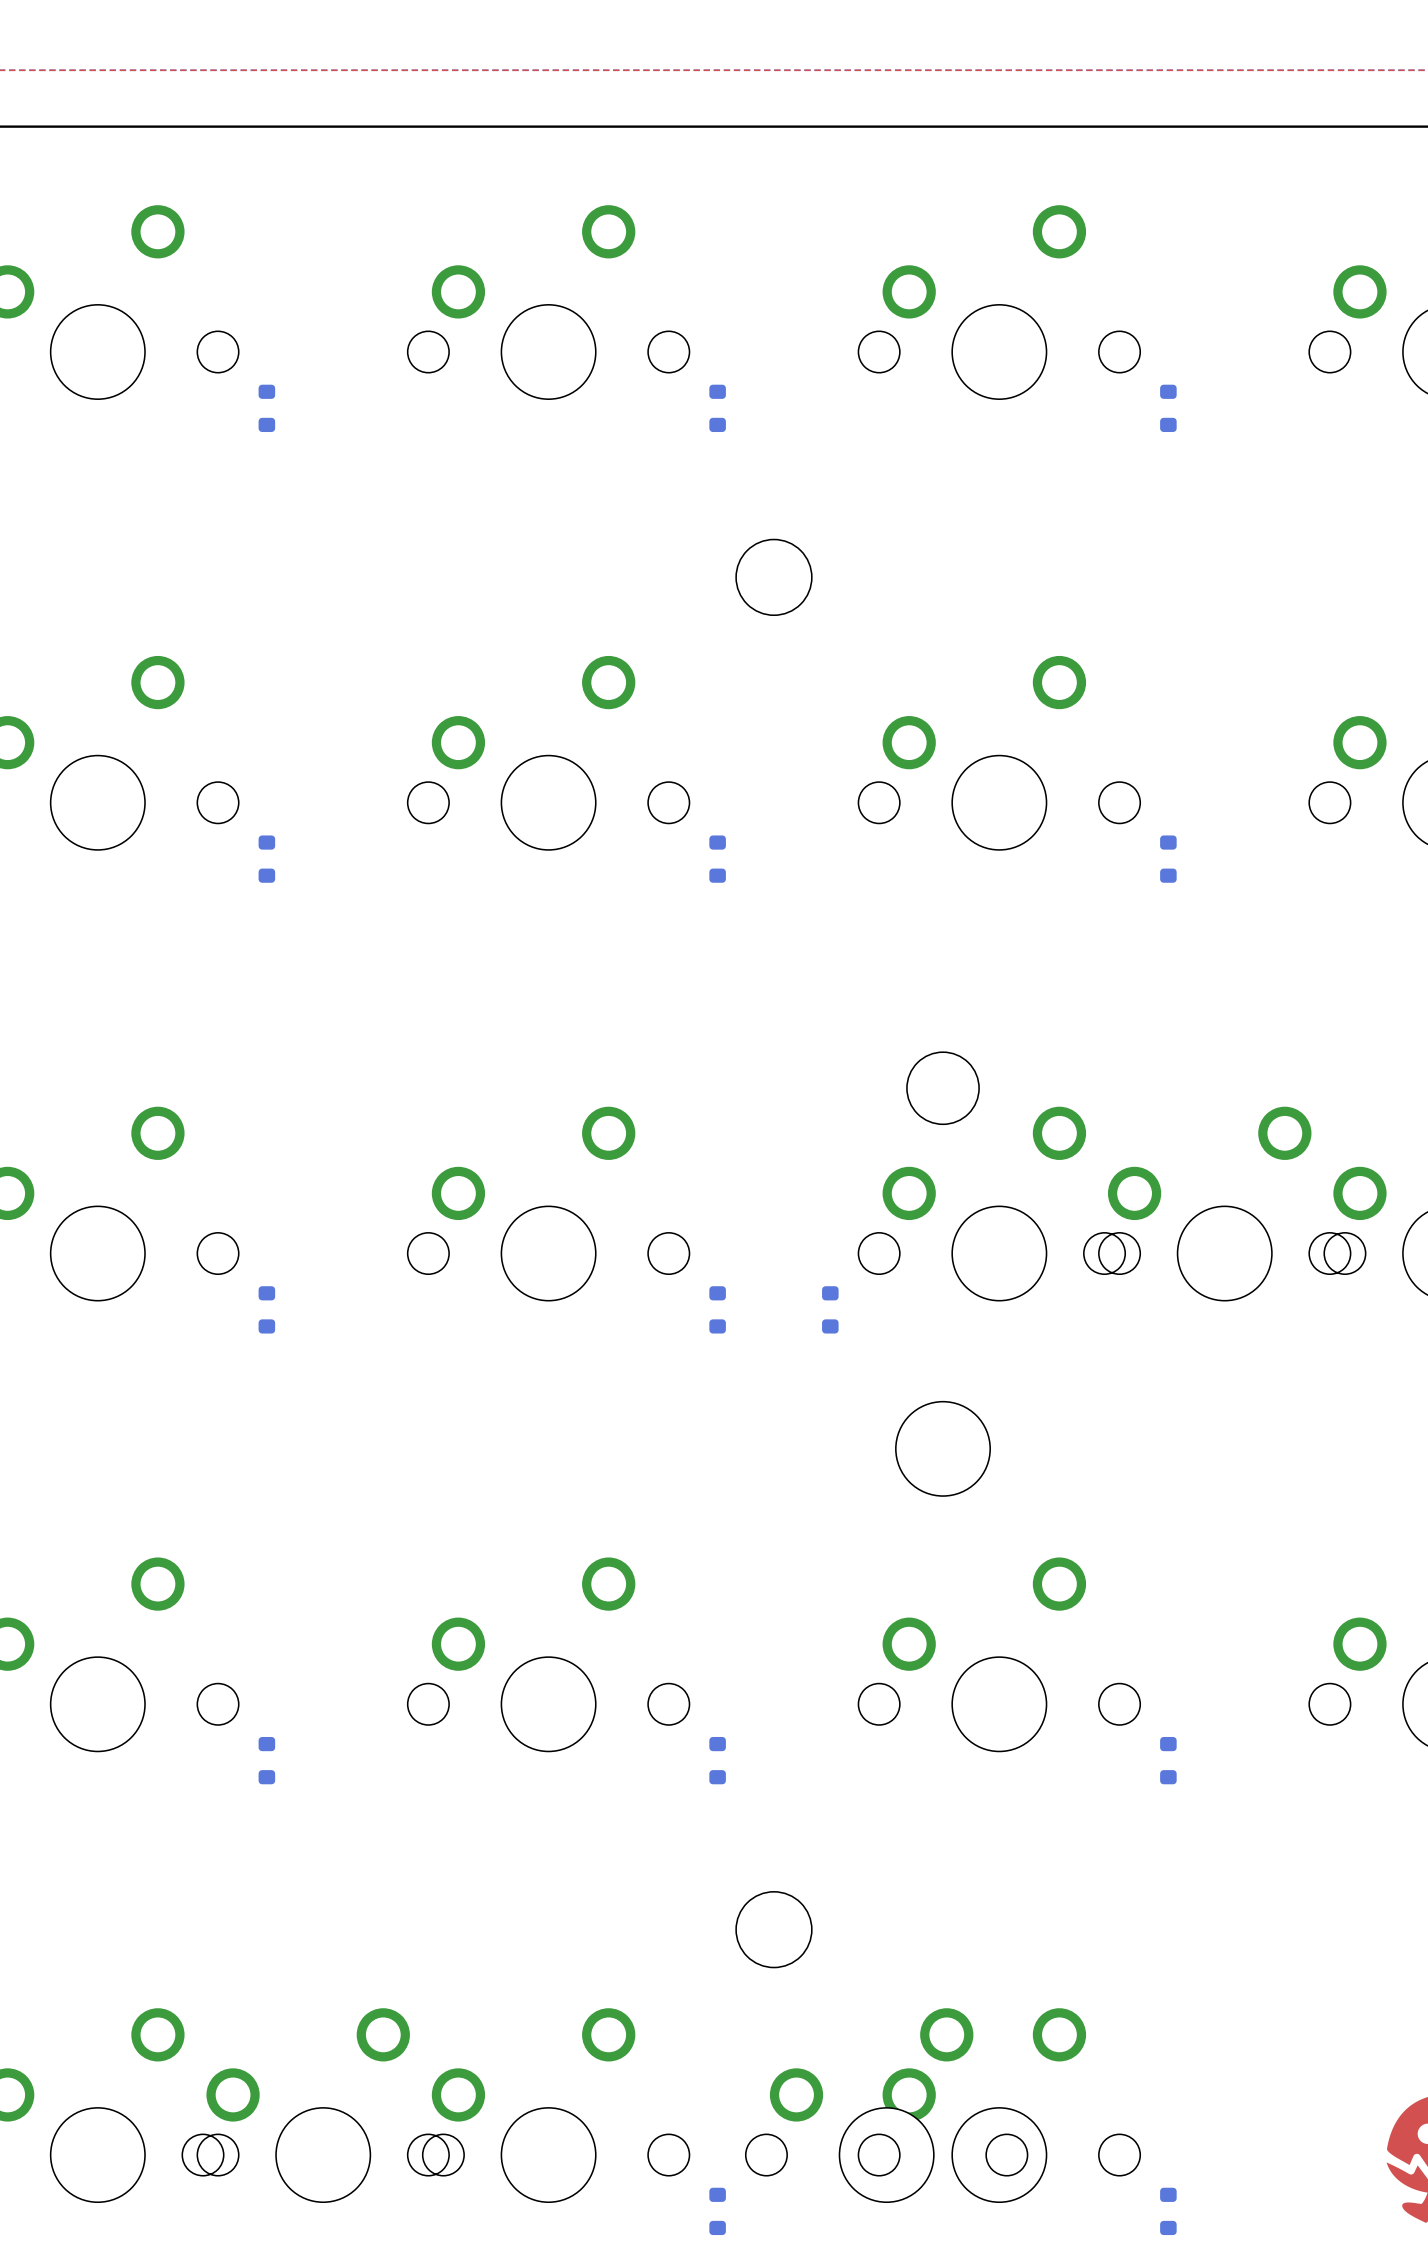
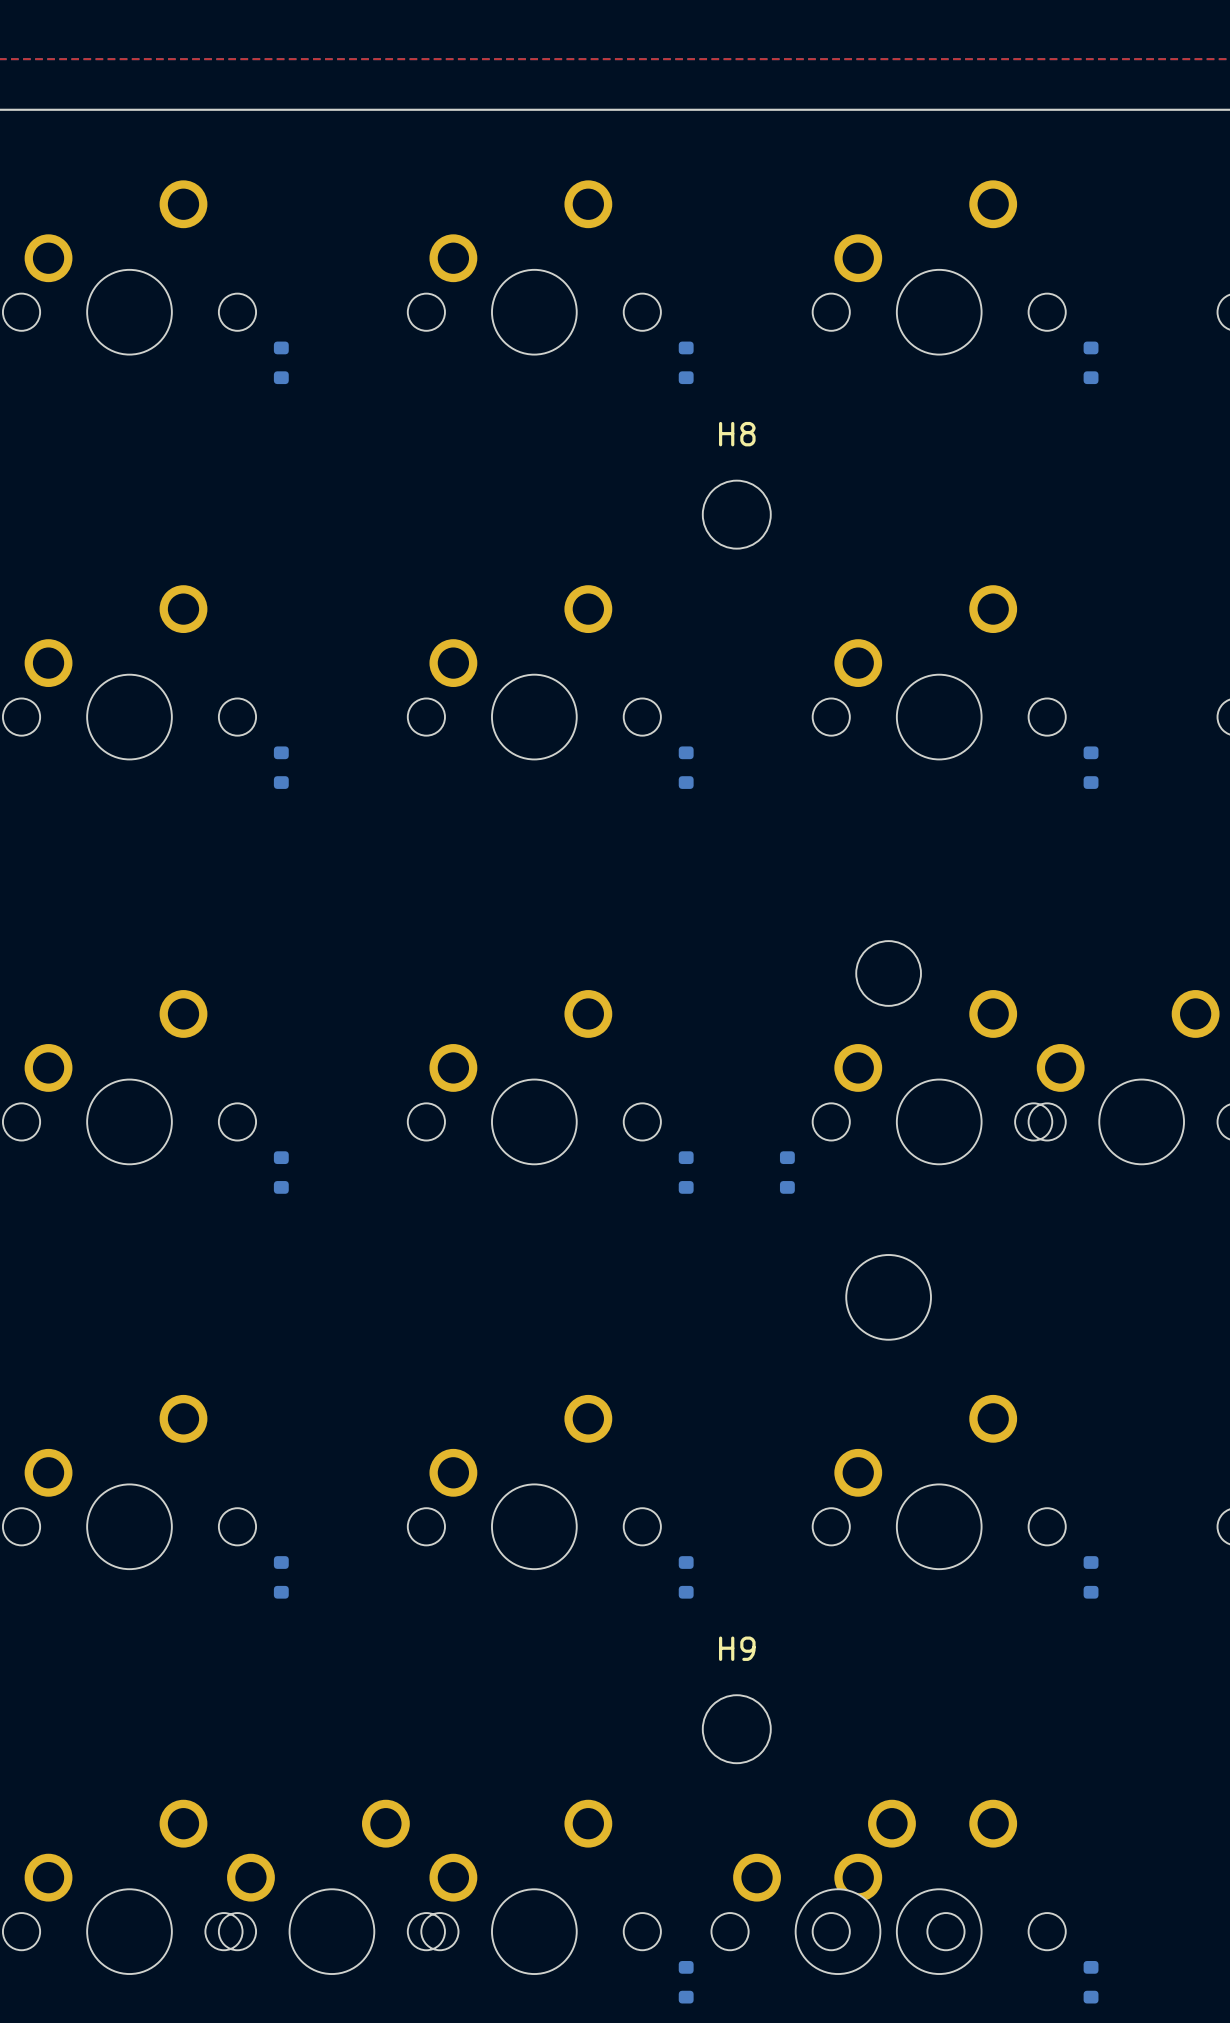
H8 name: none -> H8 (737, 434)
H9 name: none -> H9 (737, 1648)

